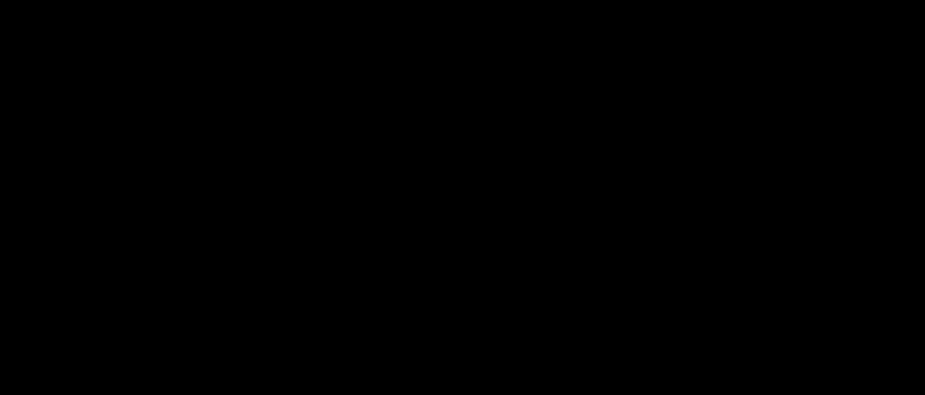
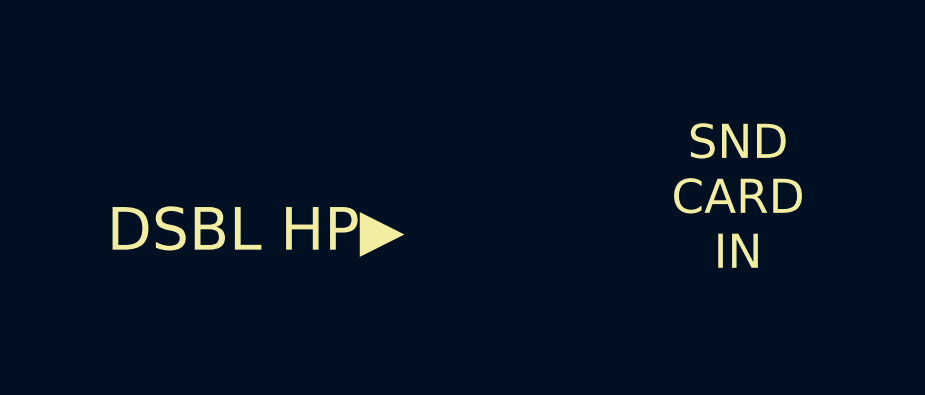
text: none -> SND (738, 140)
text: none -> CARD (738, 195)
text: none -> DSBL HP▶︎ (258, 231)
text: none -> IN (738, 250)

